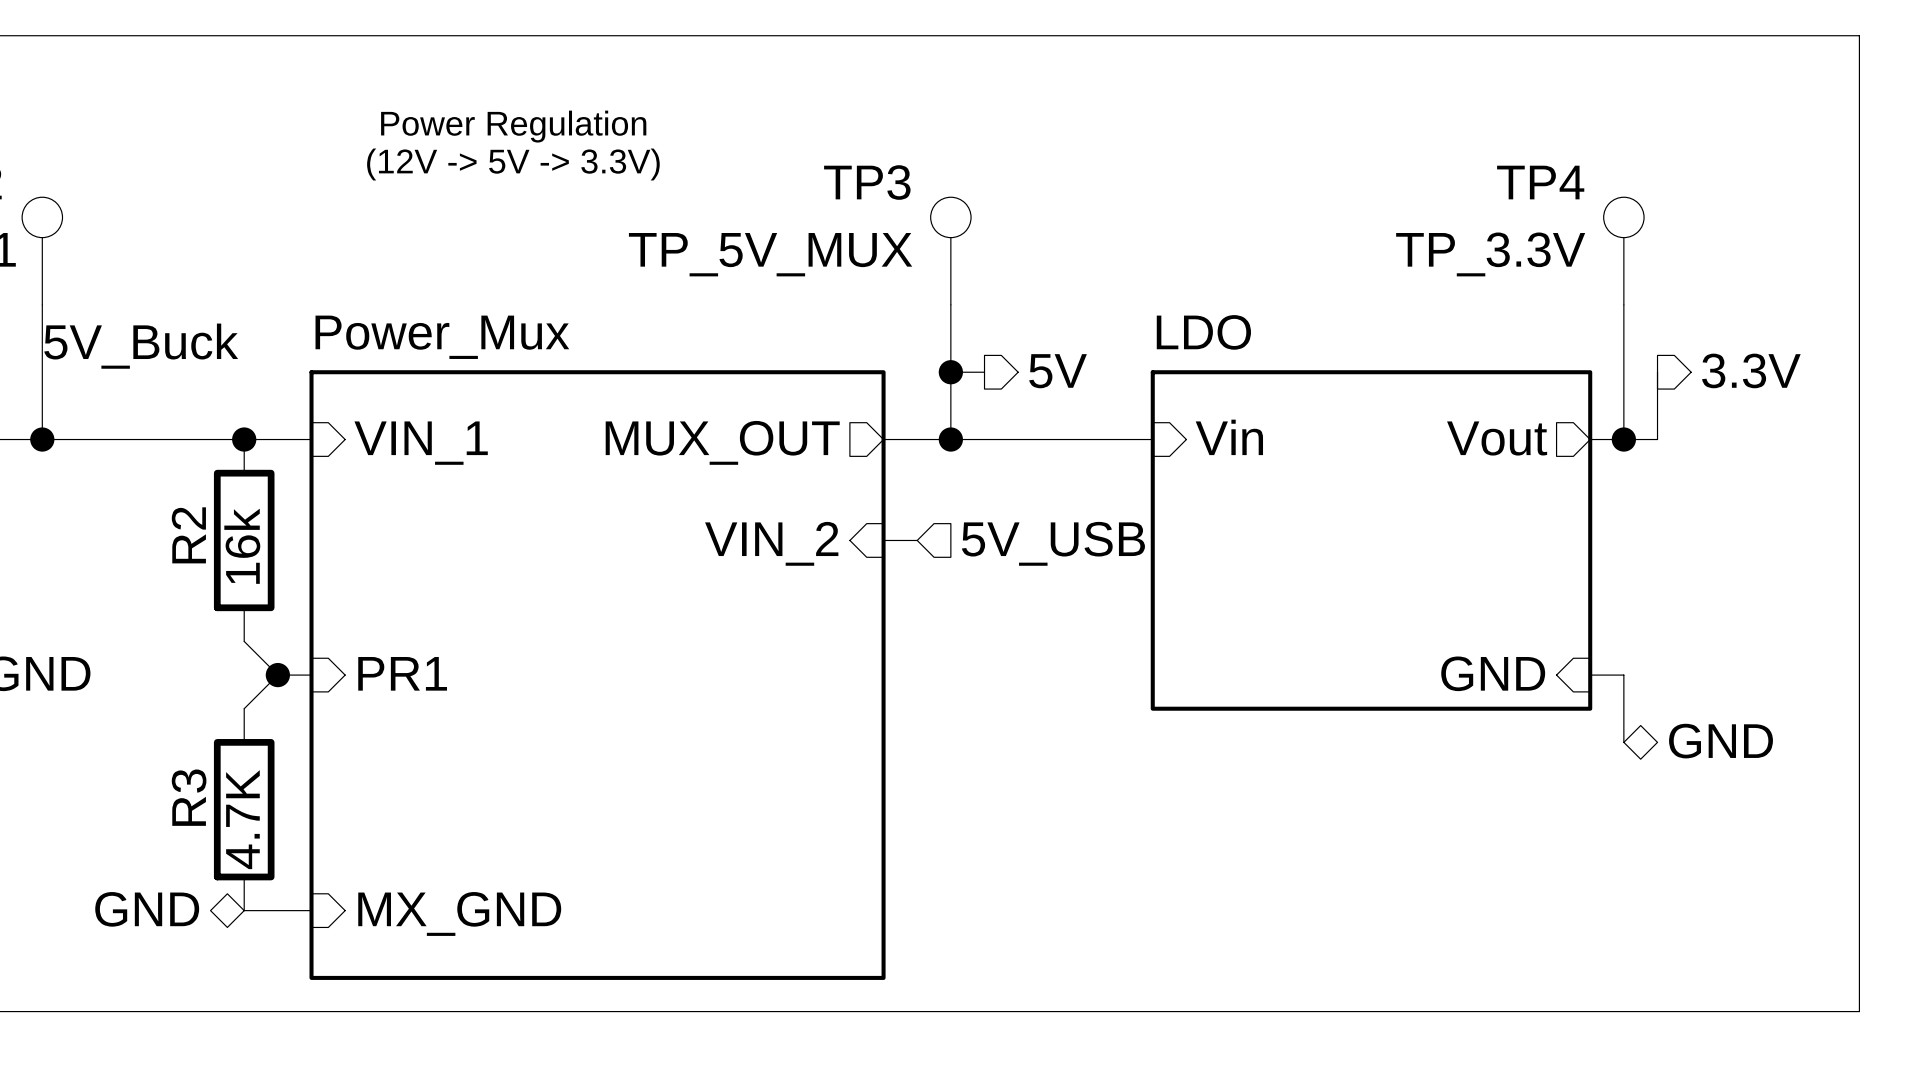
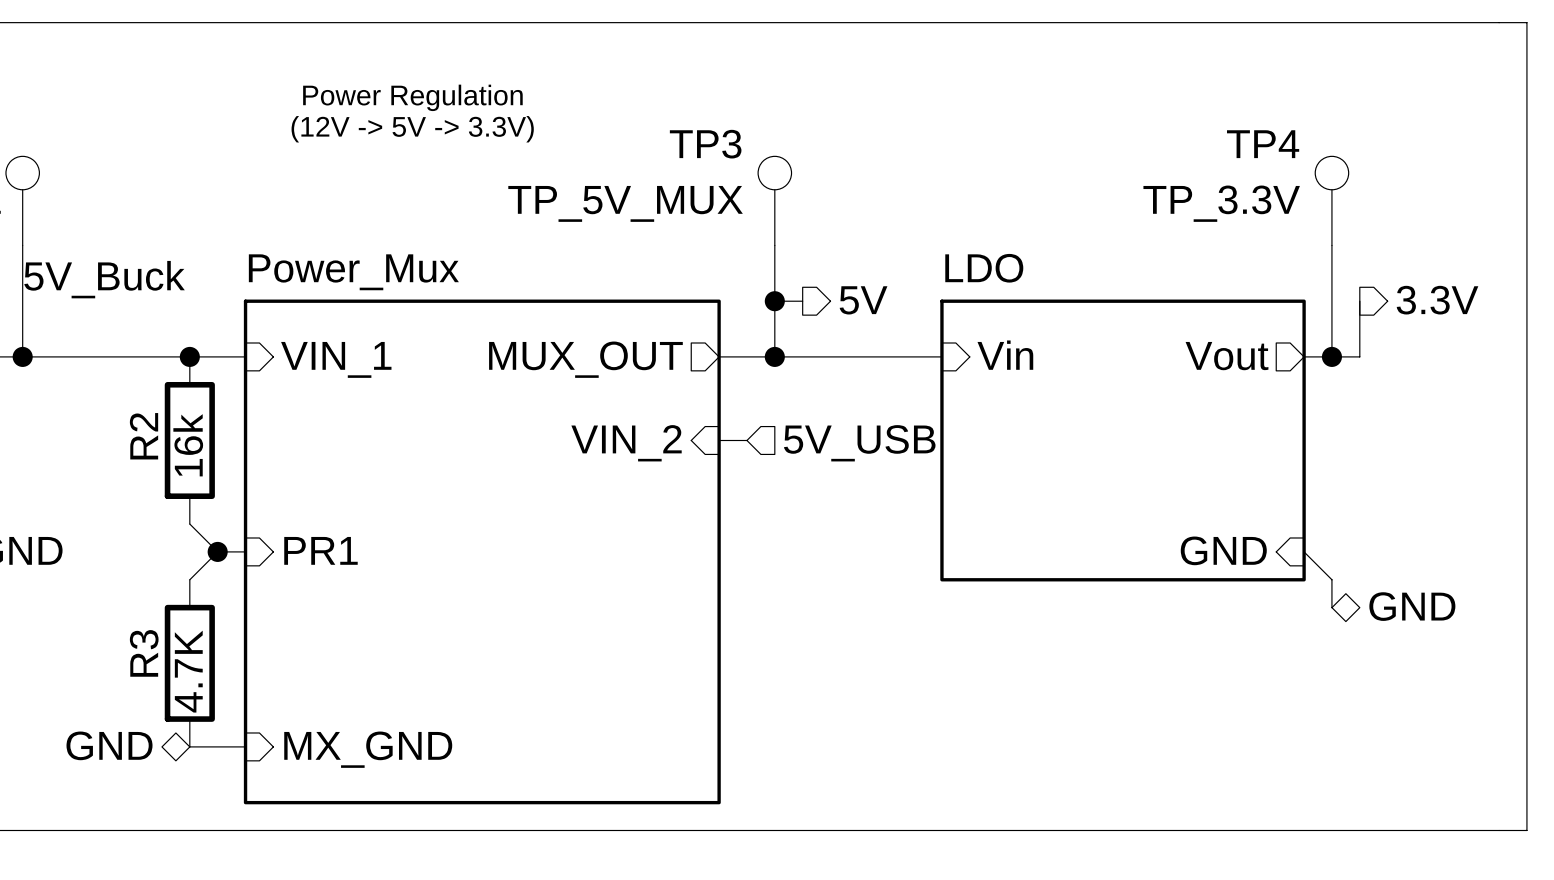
wire: (1590, 675) (1623, 675) (1623, 708) -> (1304, 551) (1331, 579)

